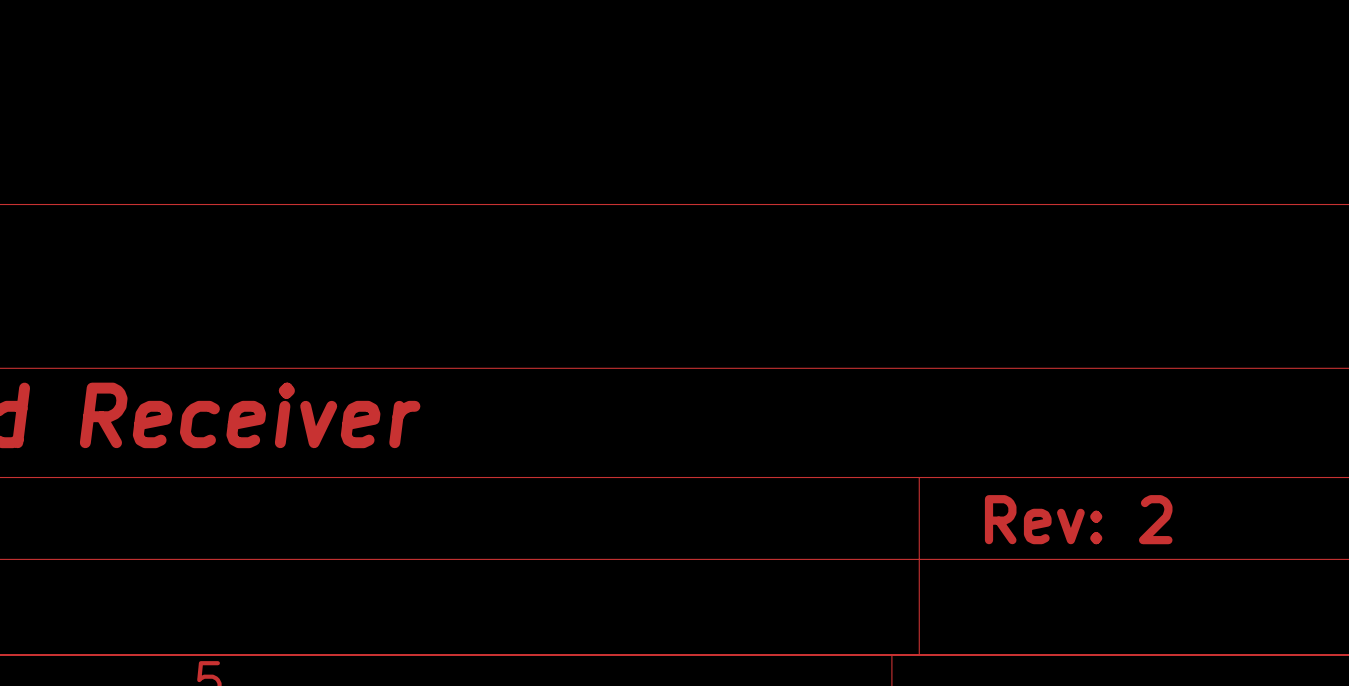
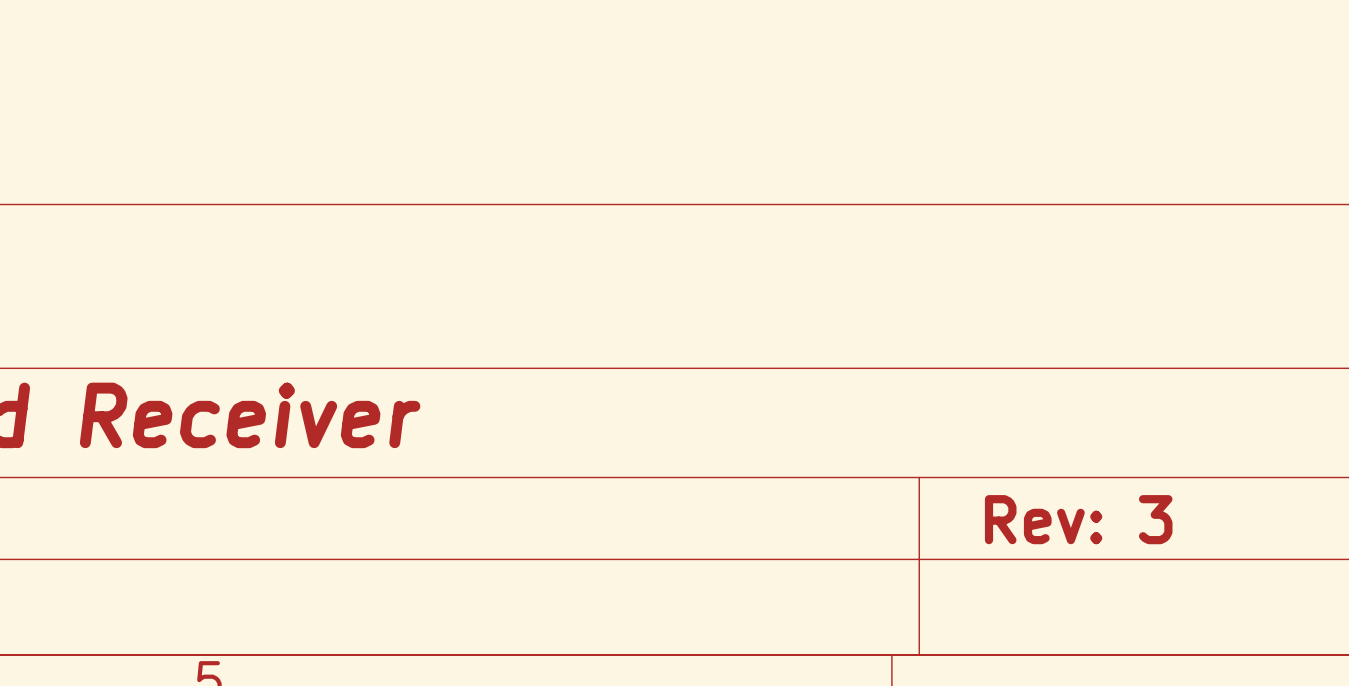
title block: Rev: 2 (1078, 519) -> Rev: 3 (1078, 519)

